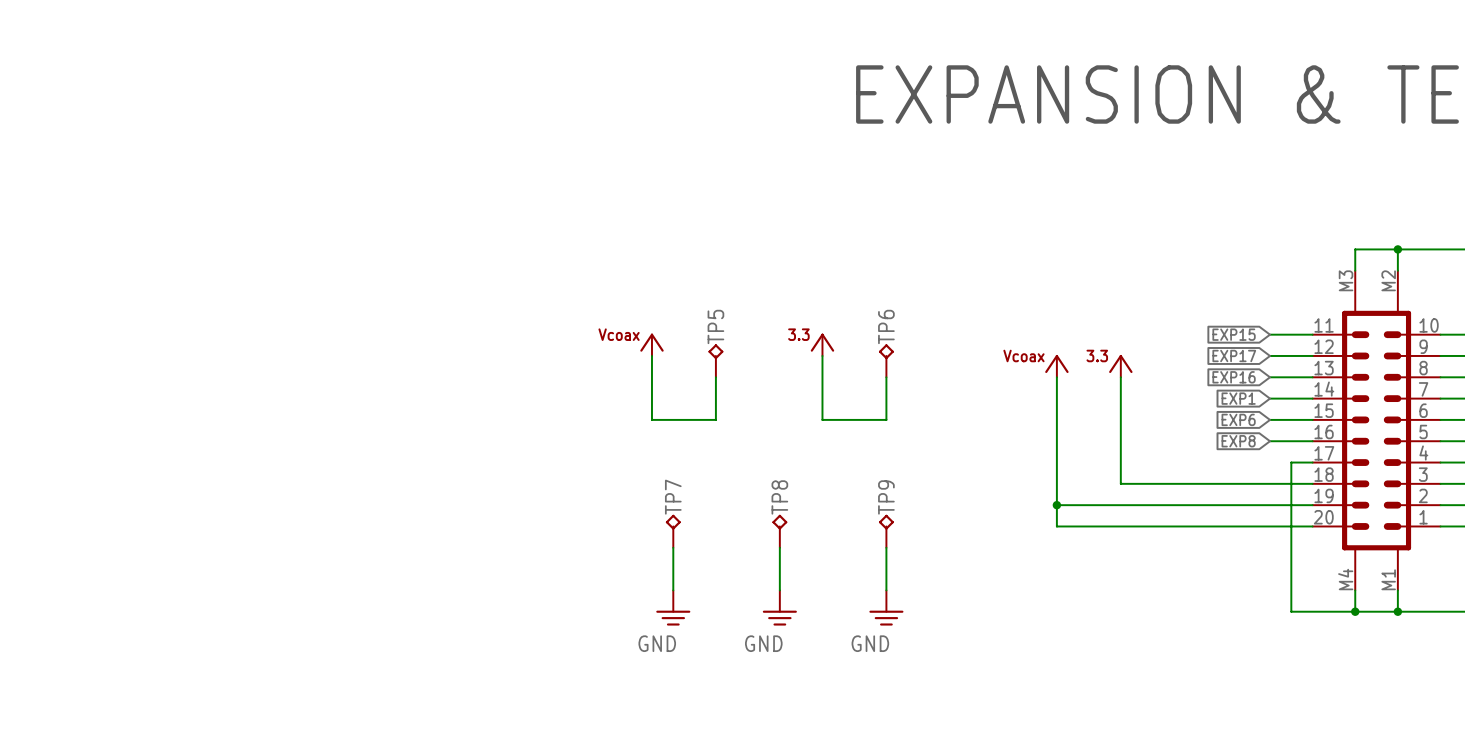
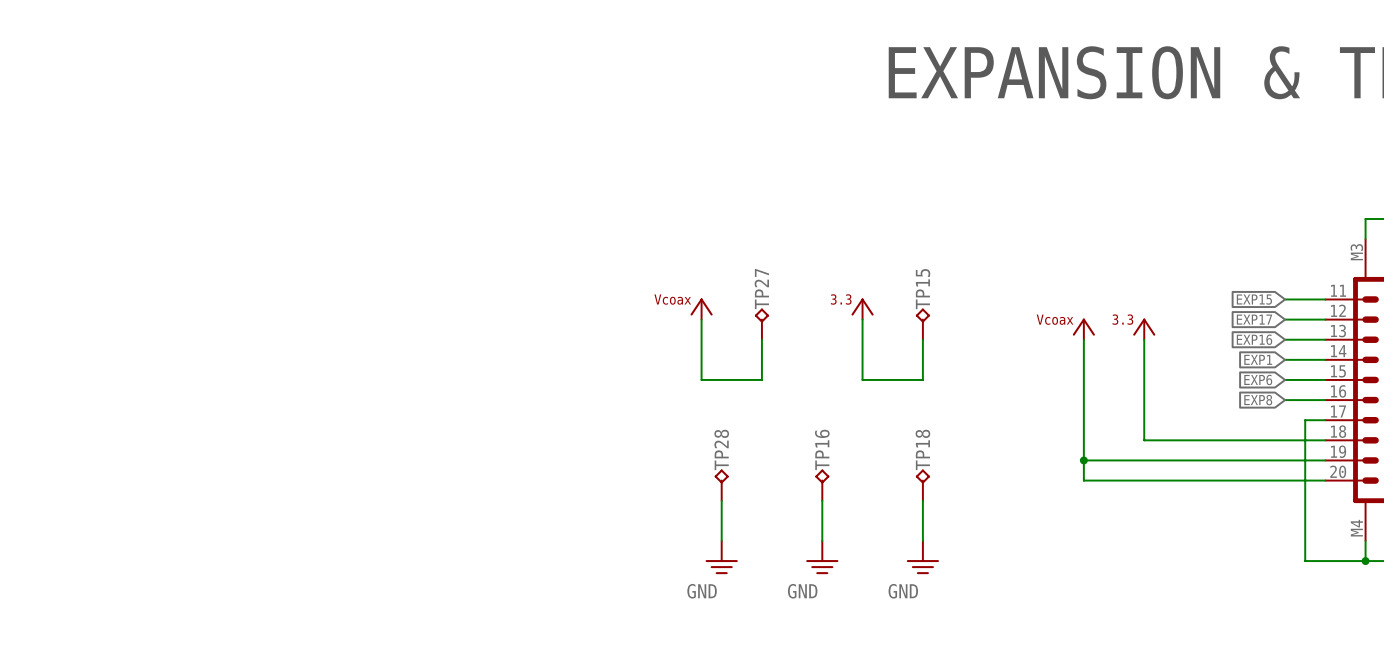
TP5 name: TP5 (715, 326) -> TP27 (761, 289)
TP6 name: TP6 (886, 326) -> TP15 (923, 289)
TP7 name: TP7 (673, 497) -> TP28 (721, 449)
TP8 name: TP8 (779, 497) -> TP16 (822, 449)
TP9 name: TP9 (886, 497) -> TP18 (922, 449)

